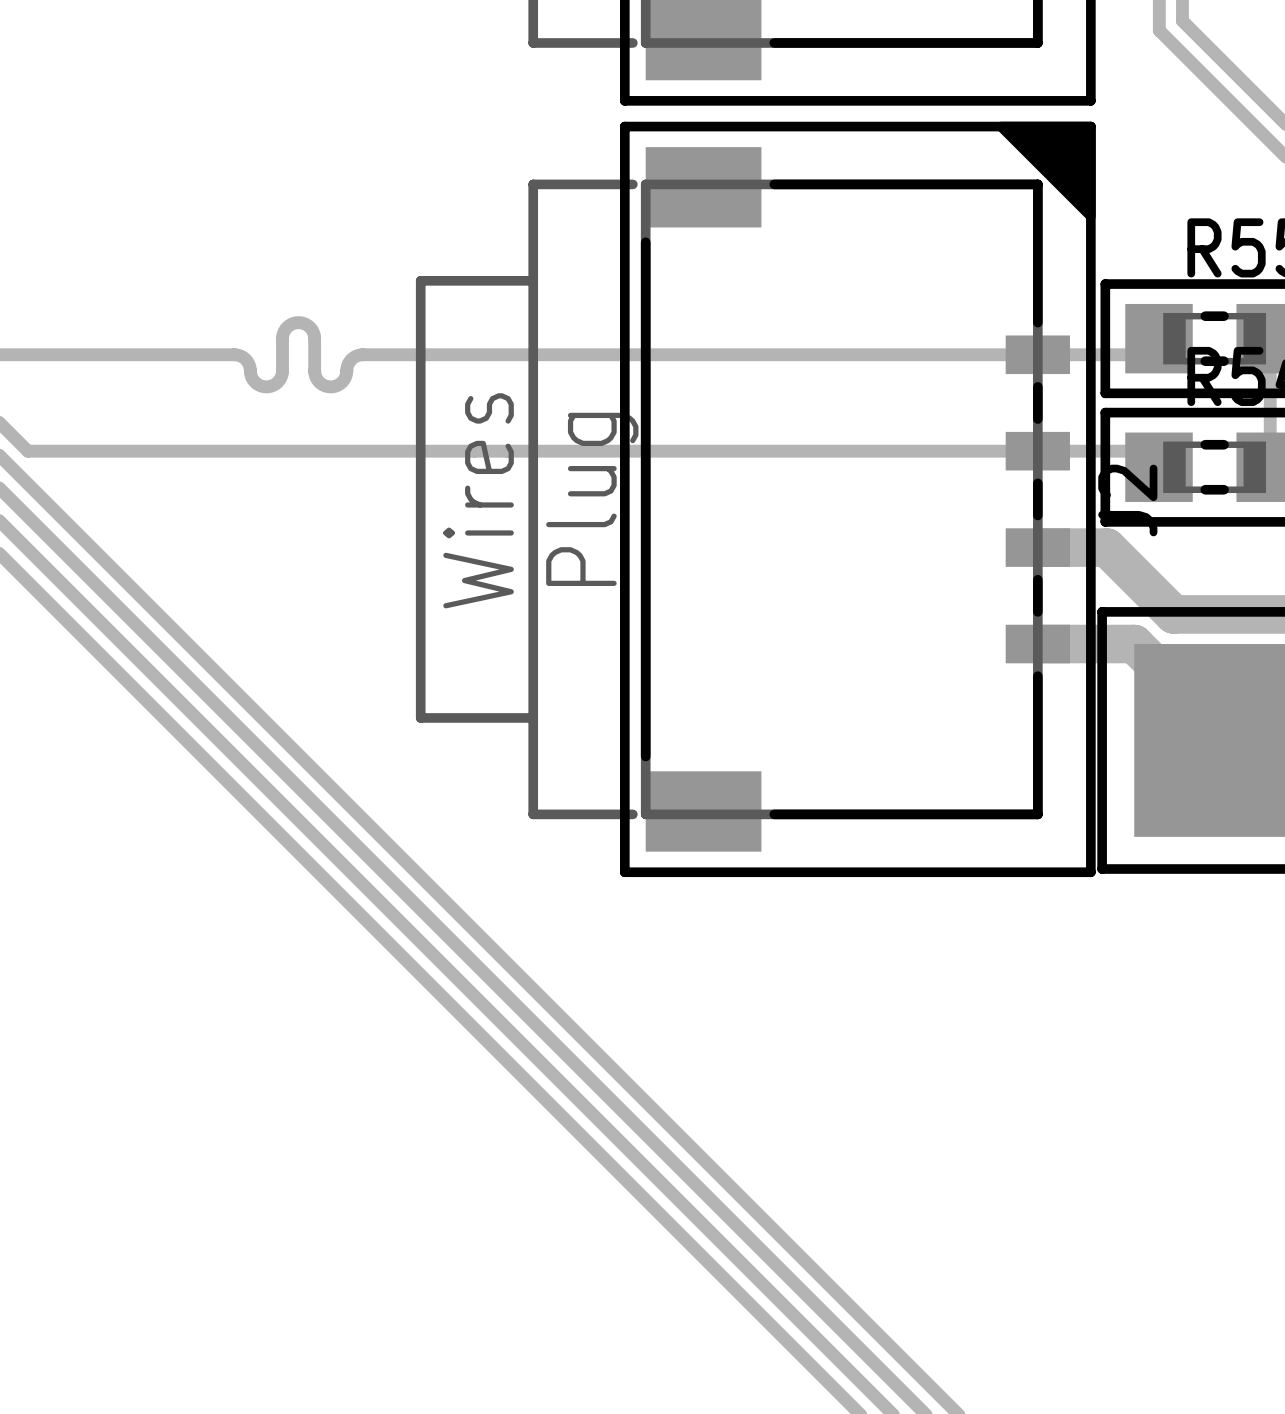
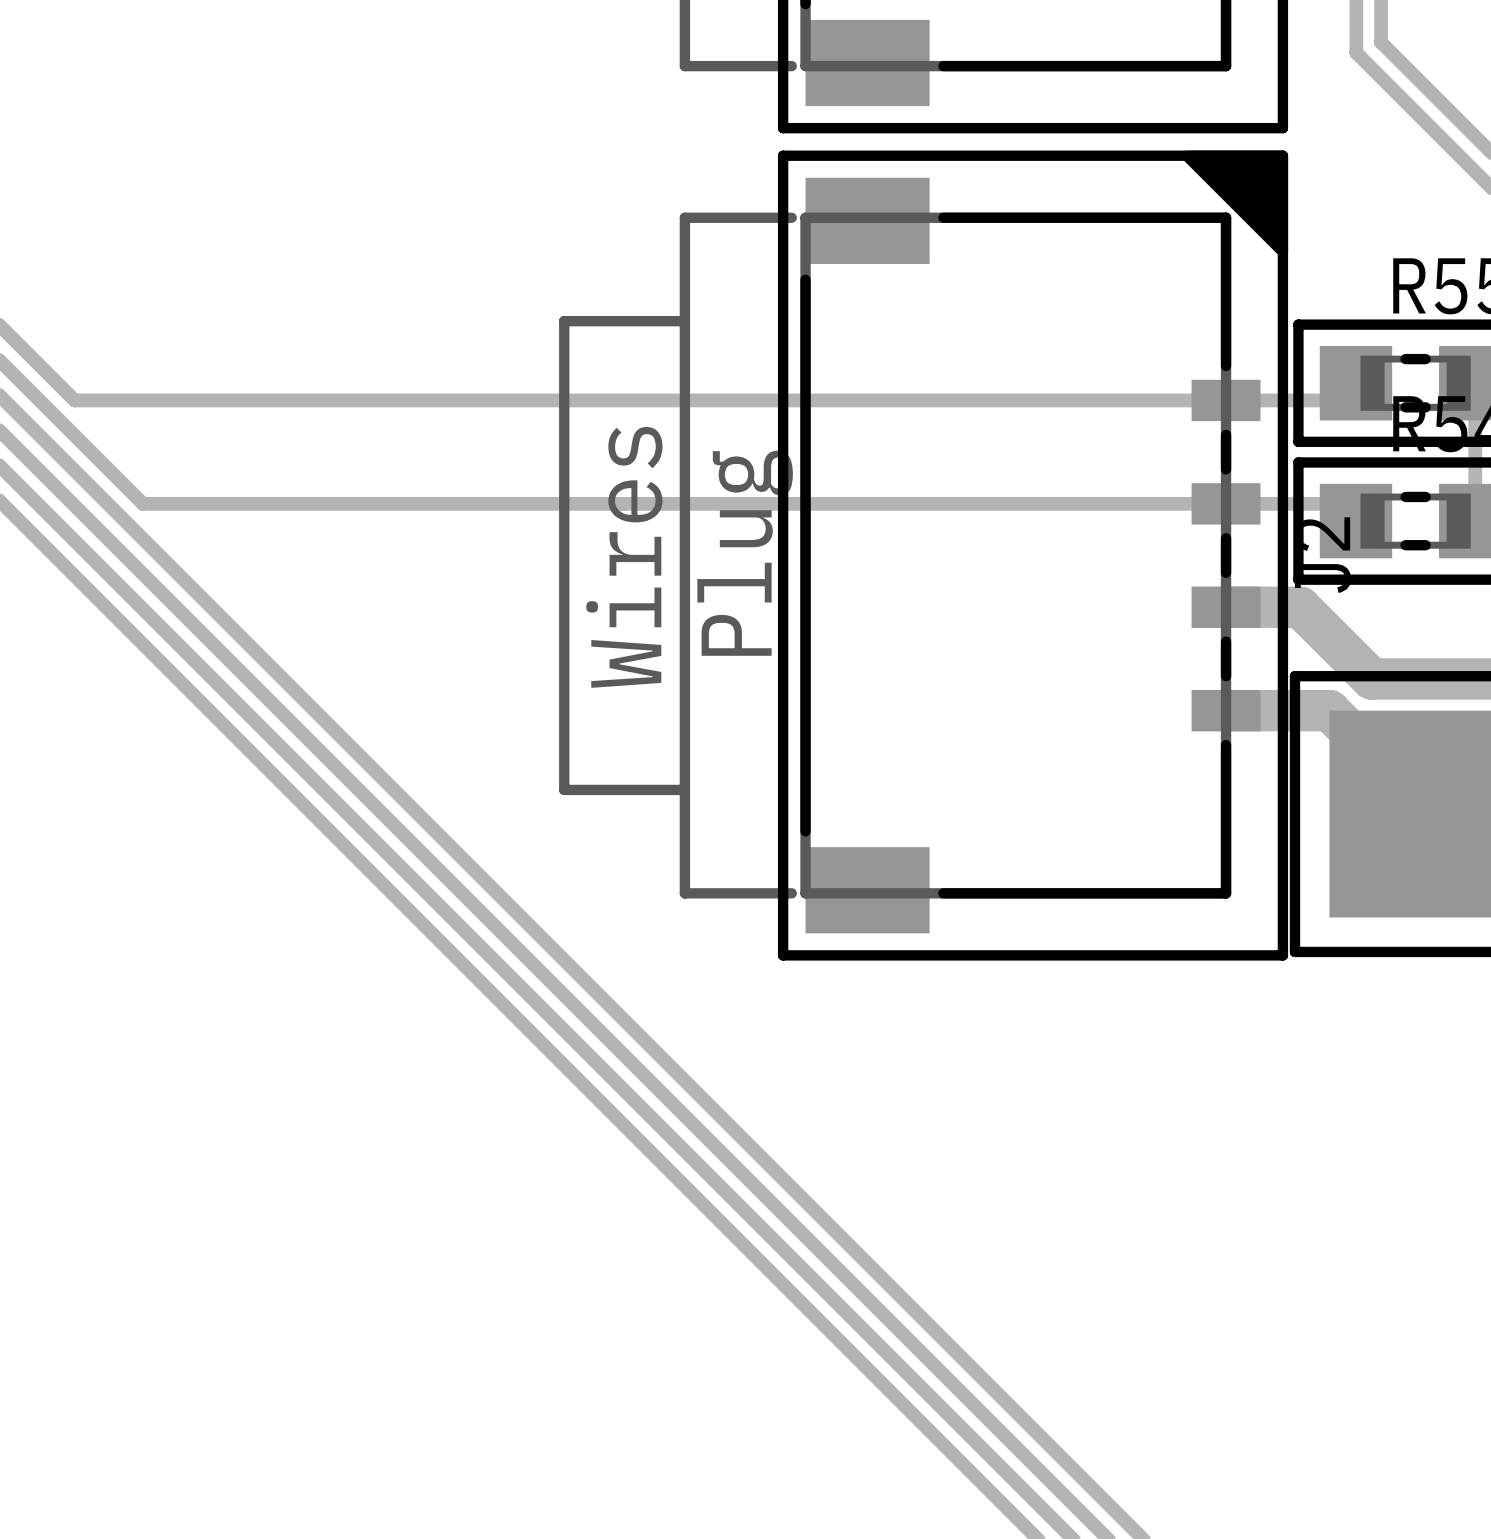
track: (362, 354) (351, 359) (343, 380) (336, 385) (330, 386) (322, 384) (315, 376) (314, 334) (309, 327) (302, 323) (292, 323) (283, 332) (281, 374) (277, 382) (272, 385) (264, 386) (256, 383) (251, 376) (247, 361) (240, 355) (234, 354) -> (502, 400) (364, 400)

